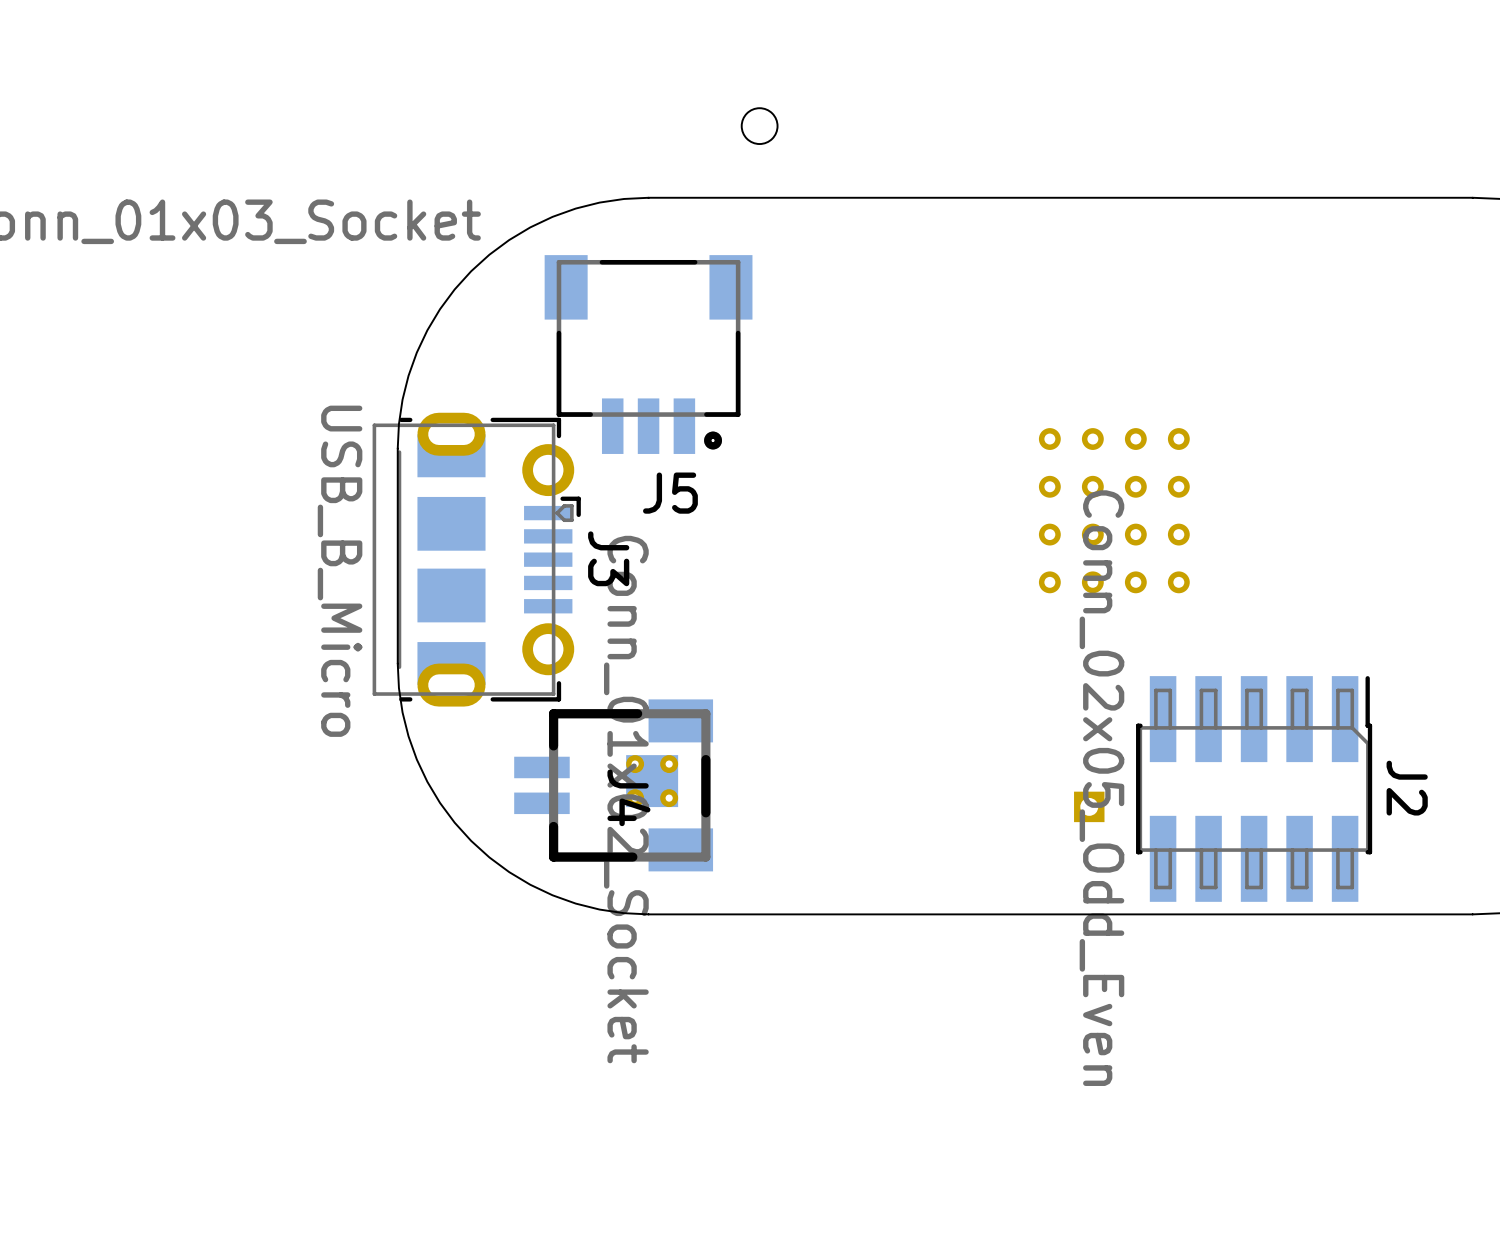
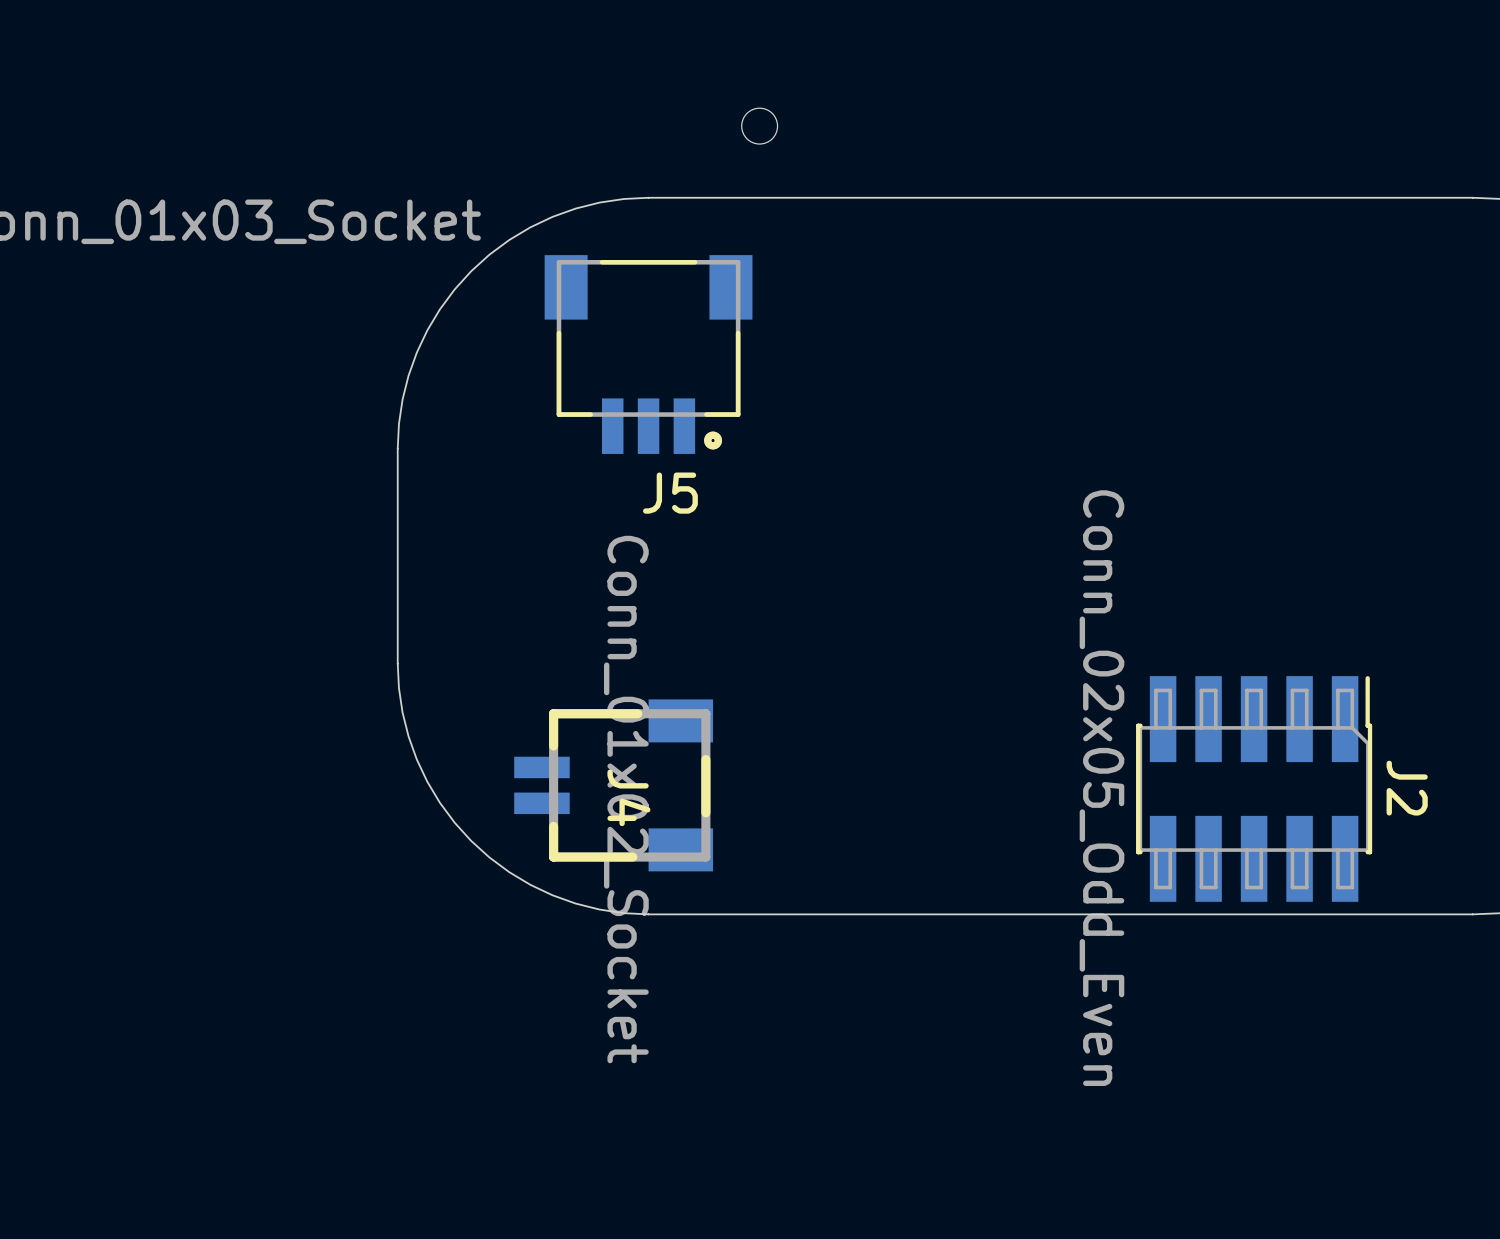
part: (1114, 510) -> none
J3: USB_B_Micro (476, 559) -> none
part: (652, 781) -> none
part: (1089, 806) -> none

